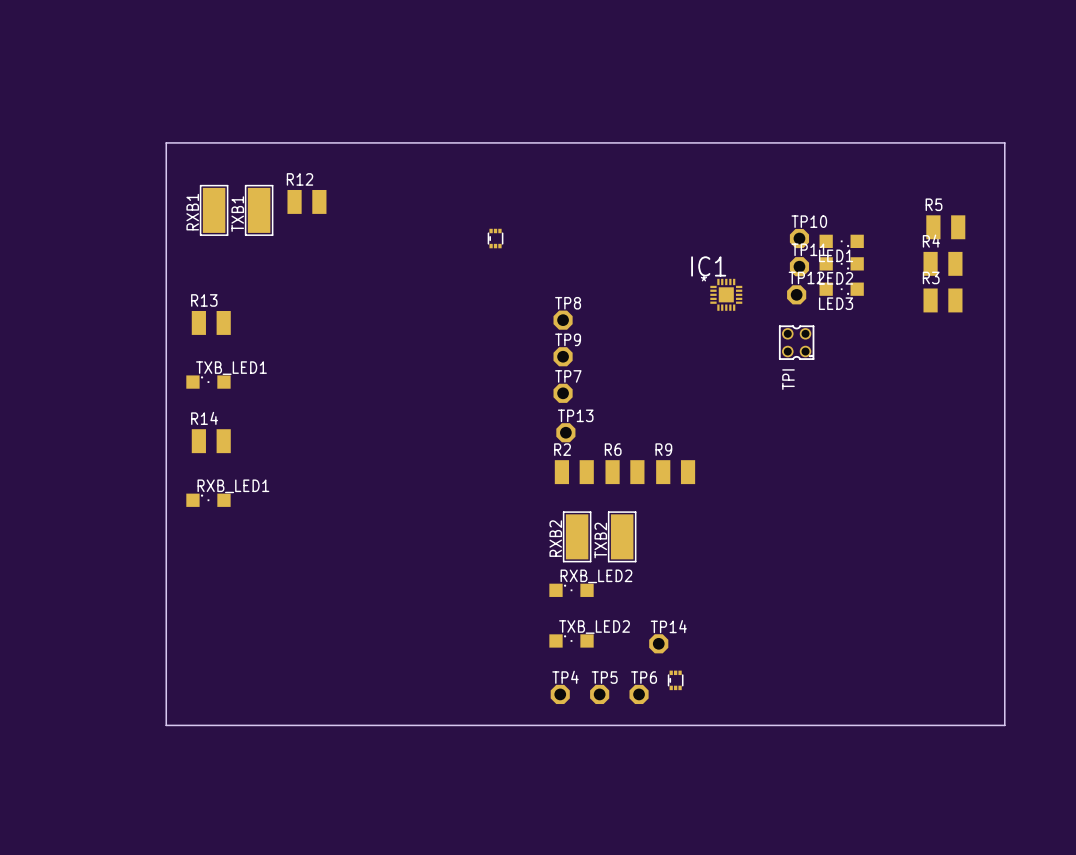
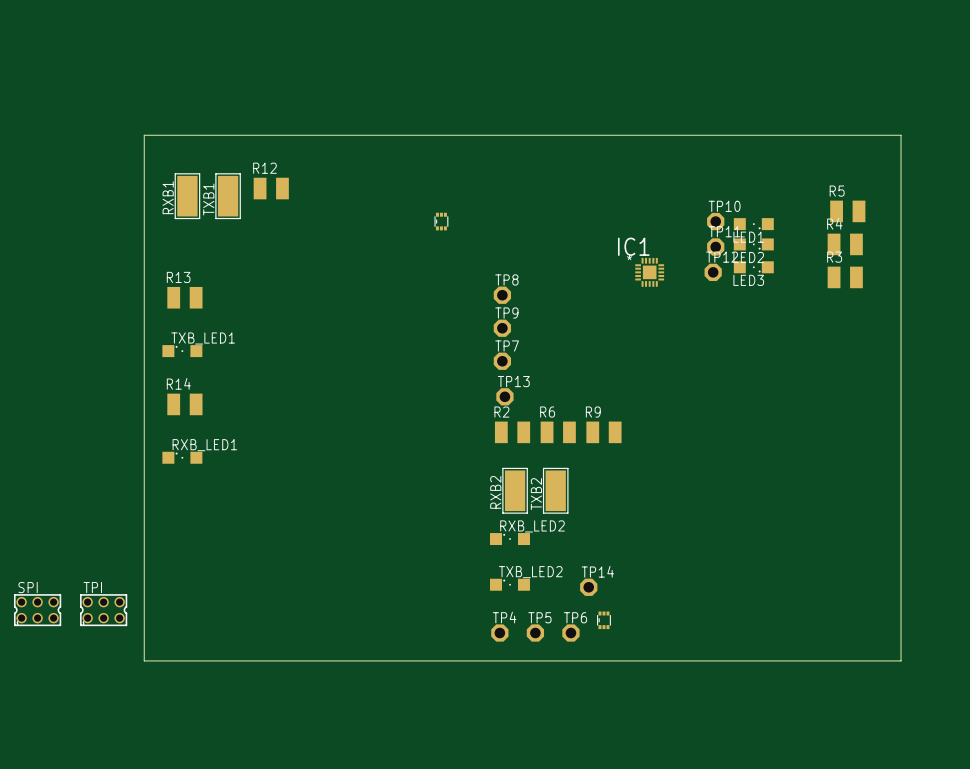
TPI: (796, 342) -> none
SPI: none -> (37, 610)
TPI: none -> (103, 610)

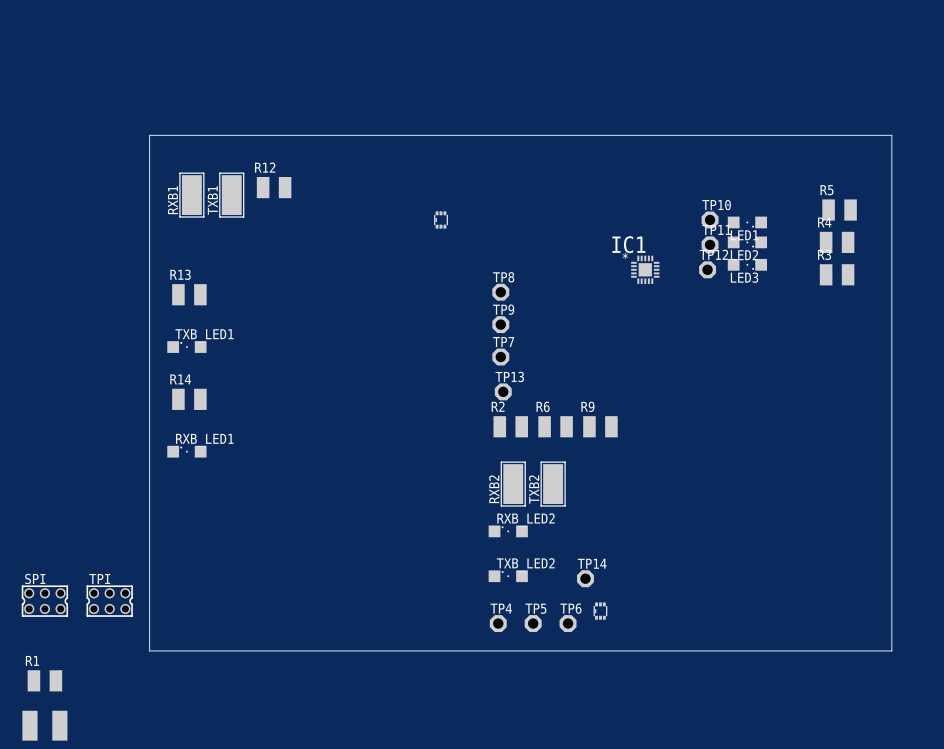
R1: none -> (44, 680)
part: none -> (44, 725)

